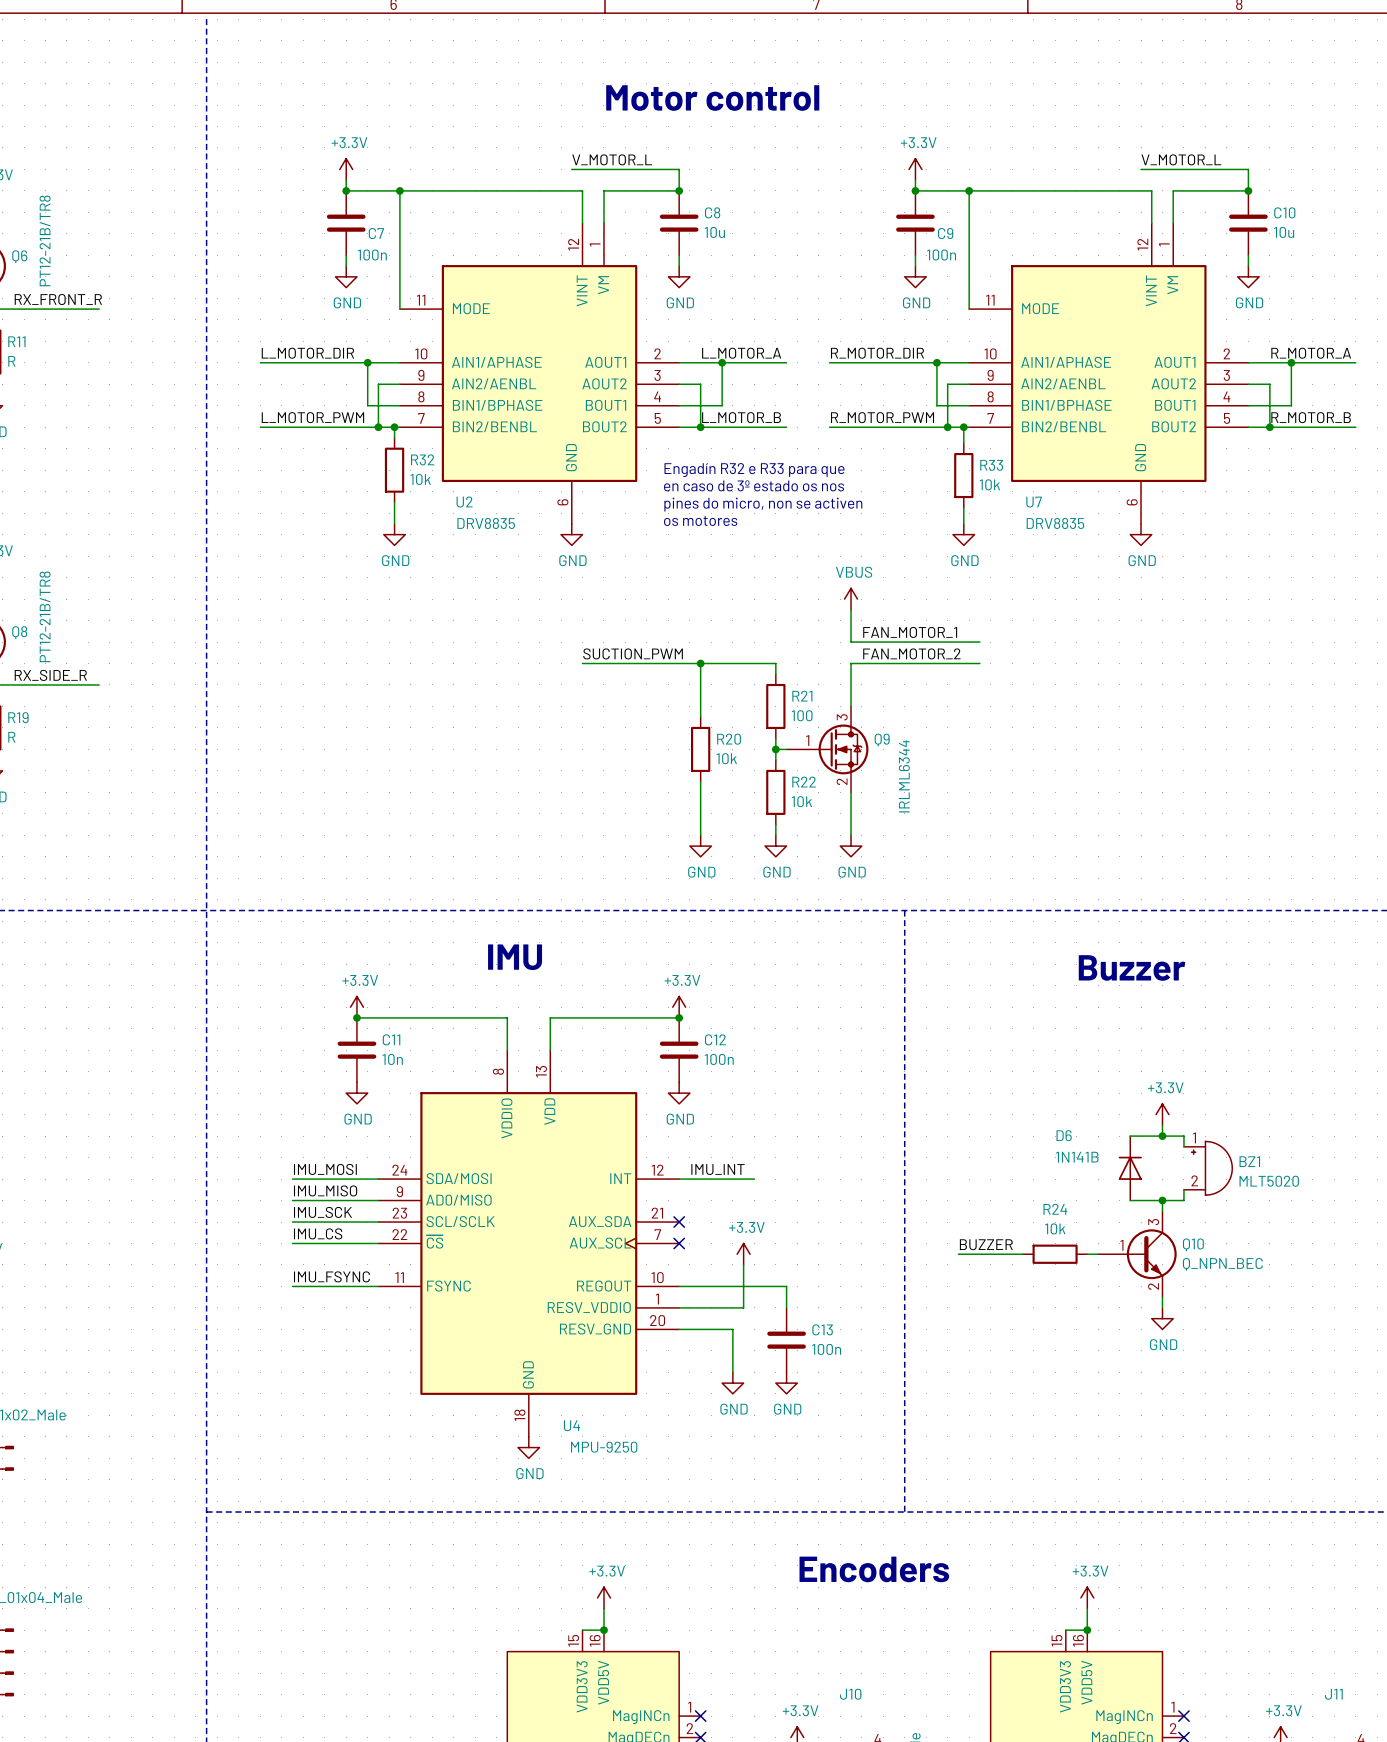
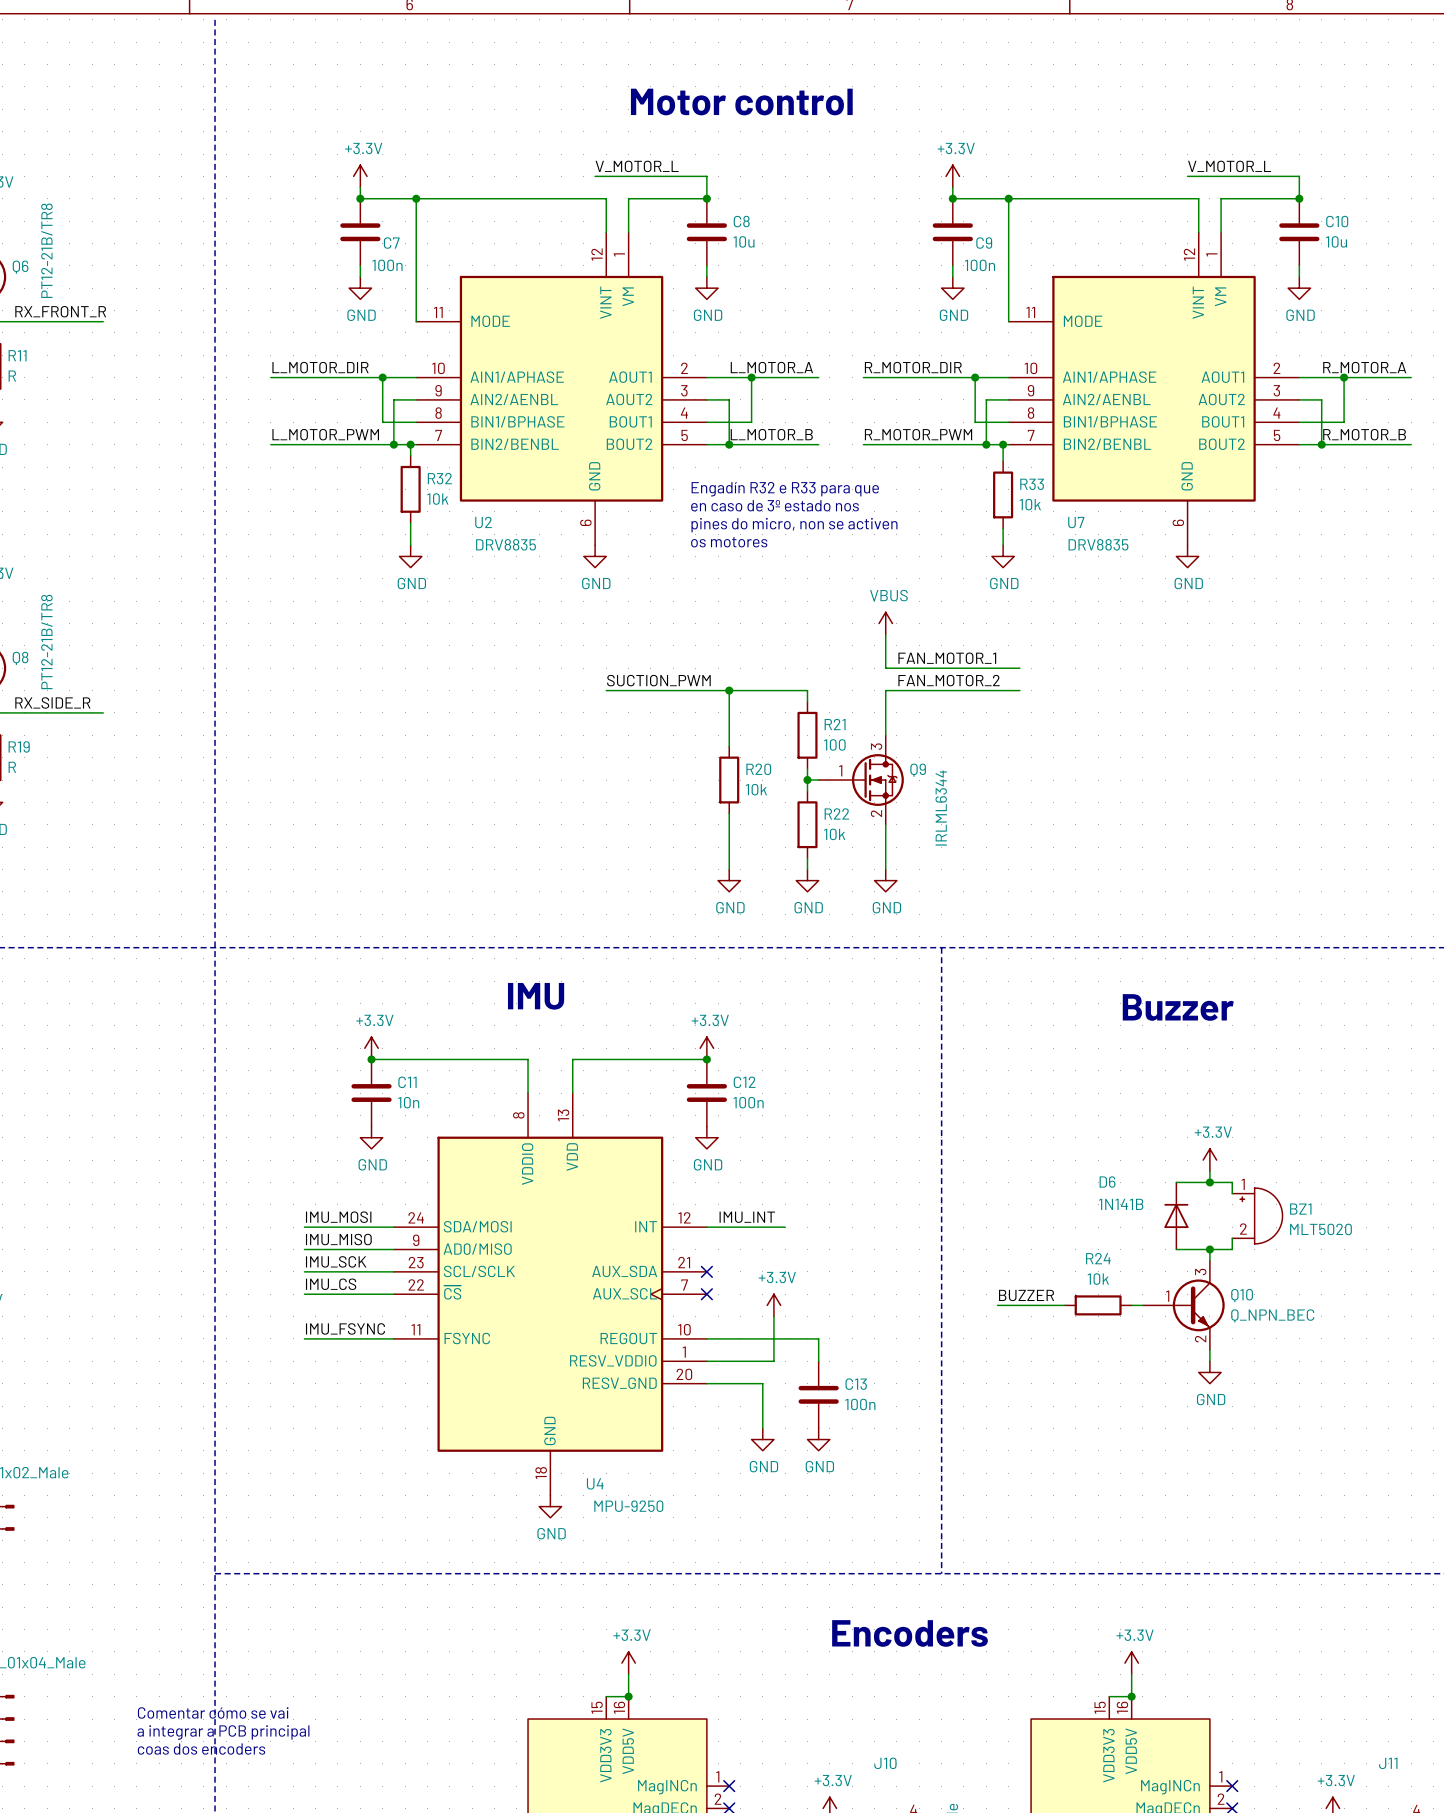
text: en caso de 3º estado os nos (754, 485) -> en caso de 3º estado nos (775, 505)
text: none -> Comentar cómo se vai (213, 1712)
text: none -> a integrar a PCB principal (223, 1732)
text: none -> coas dos encoders (201, 1749)

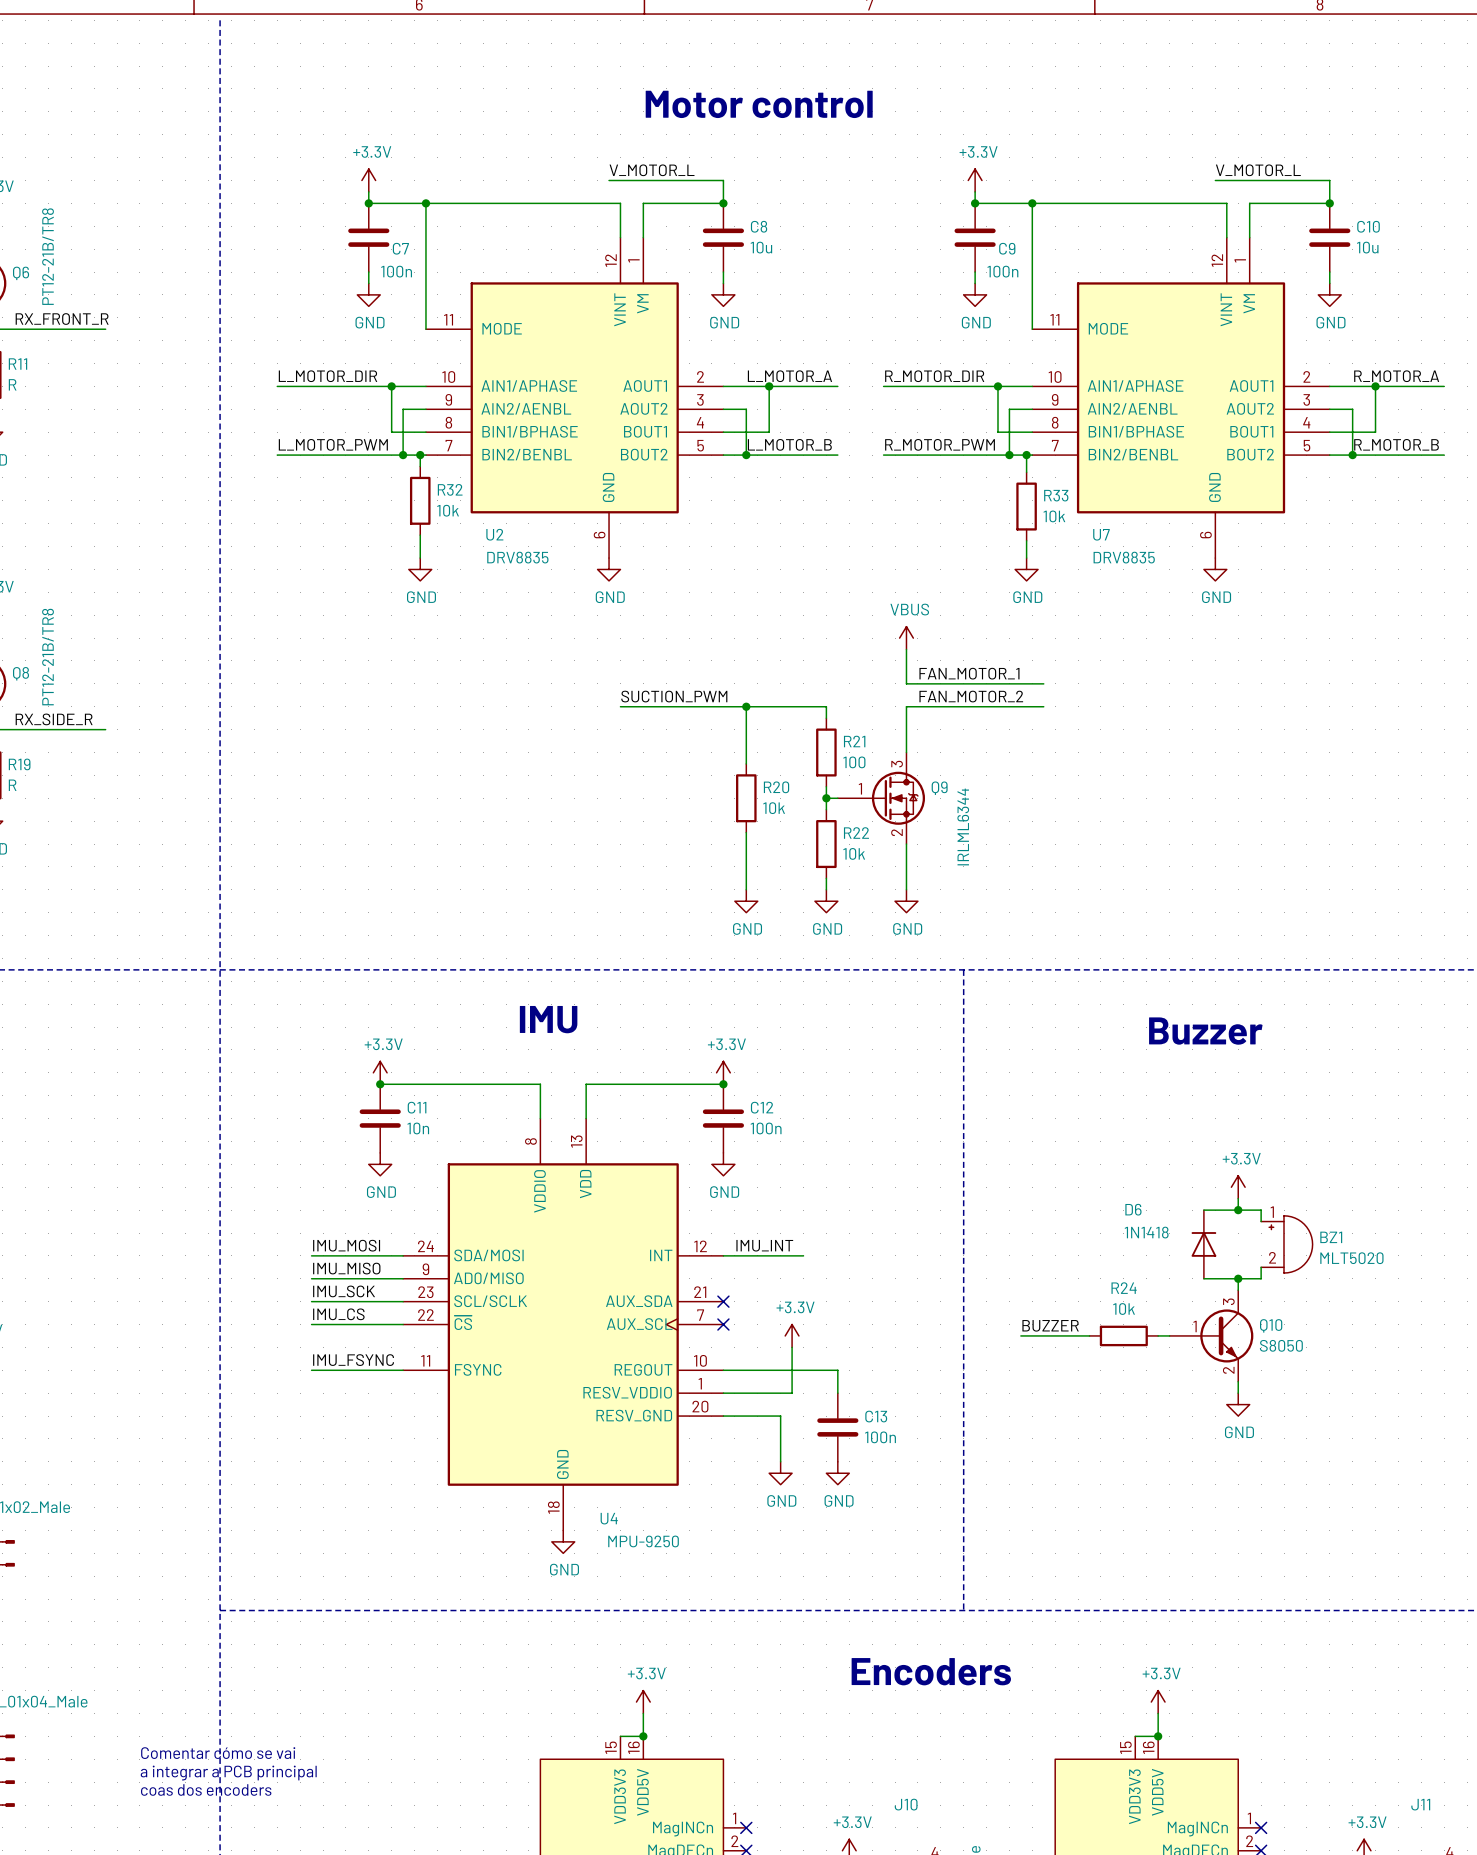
text: Engadín R32 e R33 para que (785, 489) -> none
text: en caso de 3º estado nos (775, 505) -> none
text: pines do micro, non se activen (794, 525) -> none
text: os motores (729, 542) -> none
D6 value: 1N141B (1121, 1204) -> 1N1418 (1146, 1232)
Q10 value: Q_NPN_BEC (1272, 1315) -> S8050 (1281, 1345)

